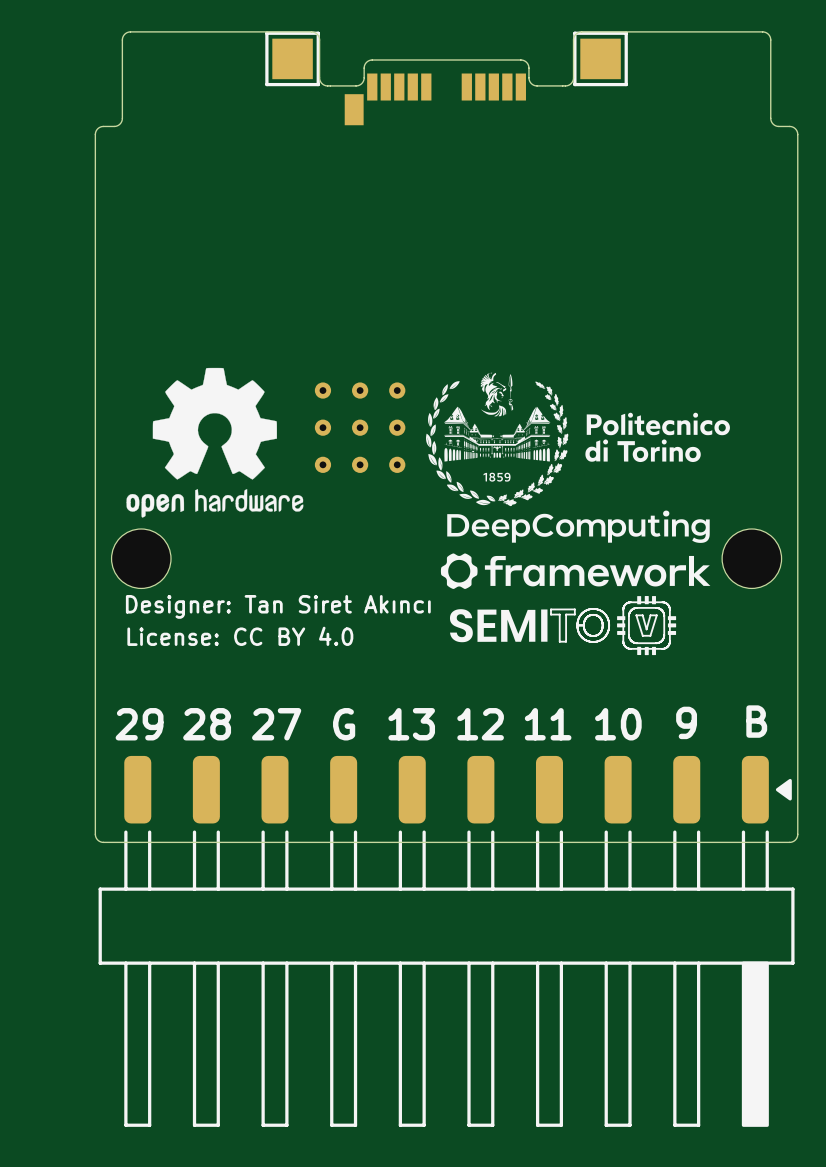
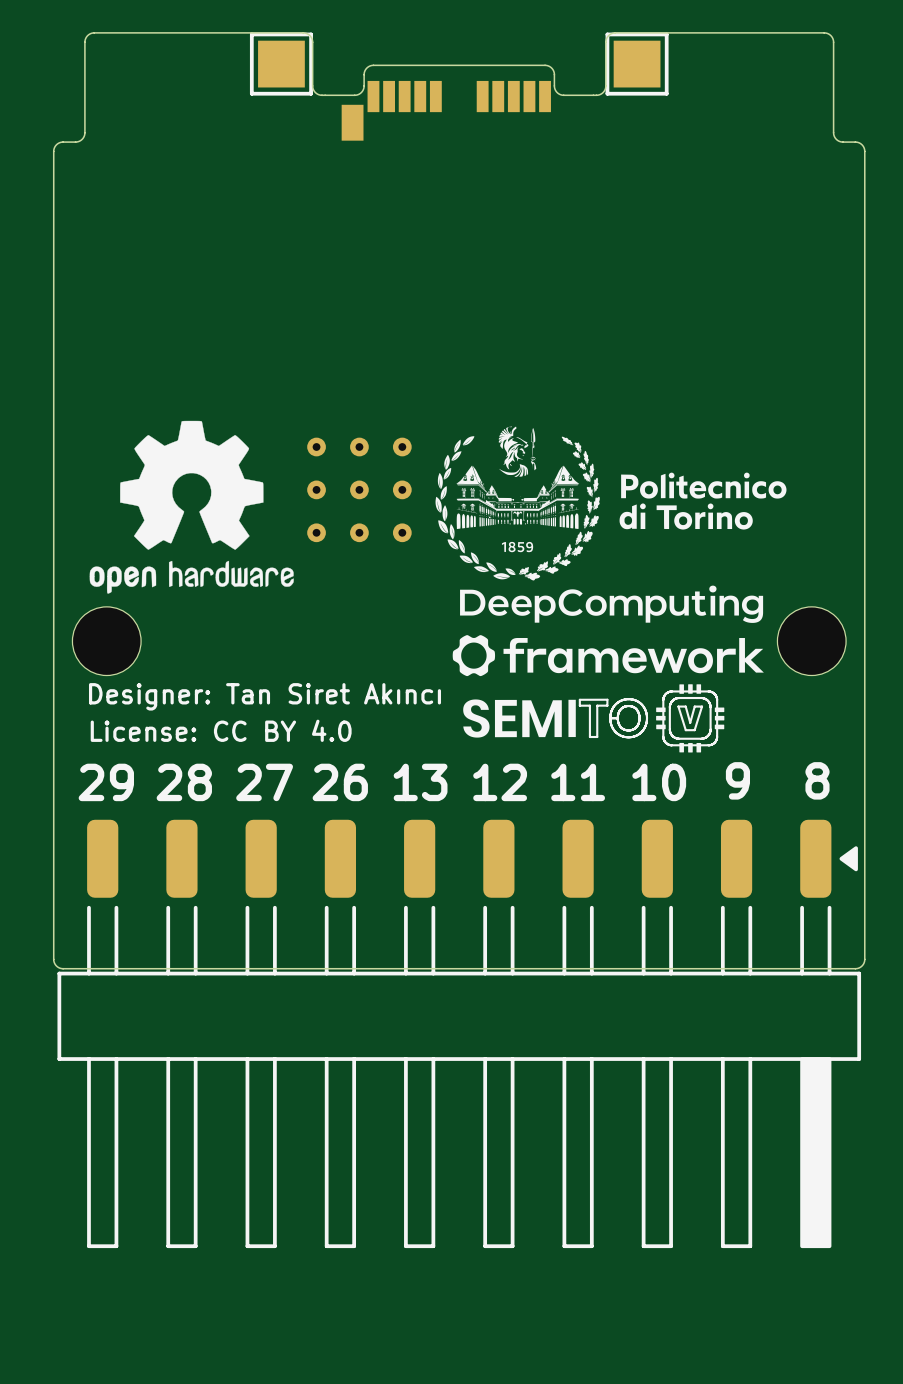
text: none -> 8 (817, 780)
text: none -> 26 (340, 782)
text: B (756, 721) -> none
text position: 9 (686, 722) -> 9 (737, 780)
text position: 29 (139, 724) -> 29 (106, 782)
text position: 28 (207, 724) -> 28 (184, 782)
text position: 27 (276, 724) -> 27 (264, 782)
text: G (344, 724) -> none
text position: 13 (411, 724) -> 13 (420, 782)
text position: 12 (480, 724) -> 12 (500, 782)
text position: 11 (548, 724) -> 11 (578, 782)
text position: 10 (618, 724) -> 10 (659, 782)
part position: (446, 941) -> (459, 1033)

